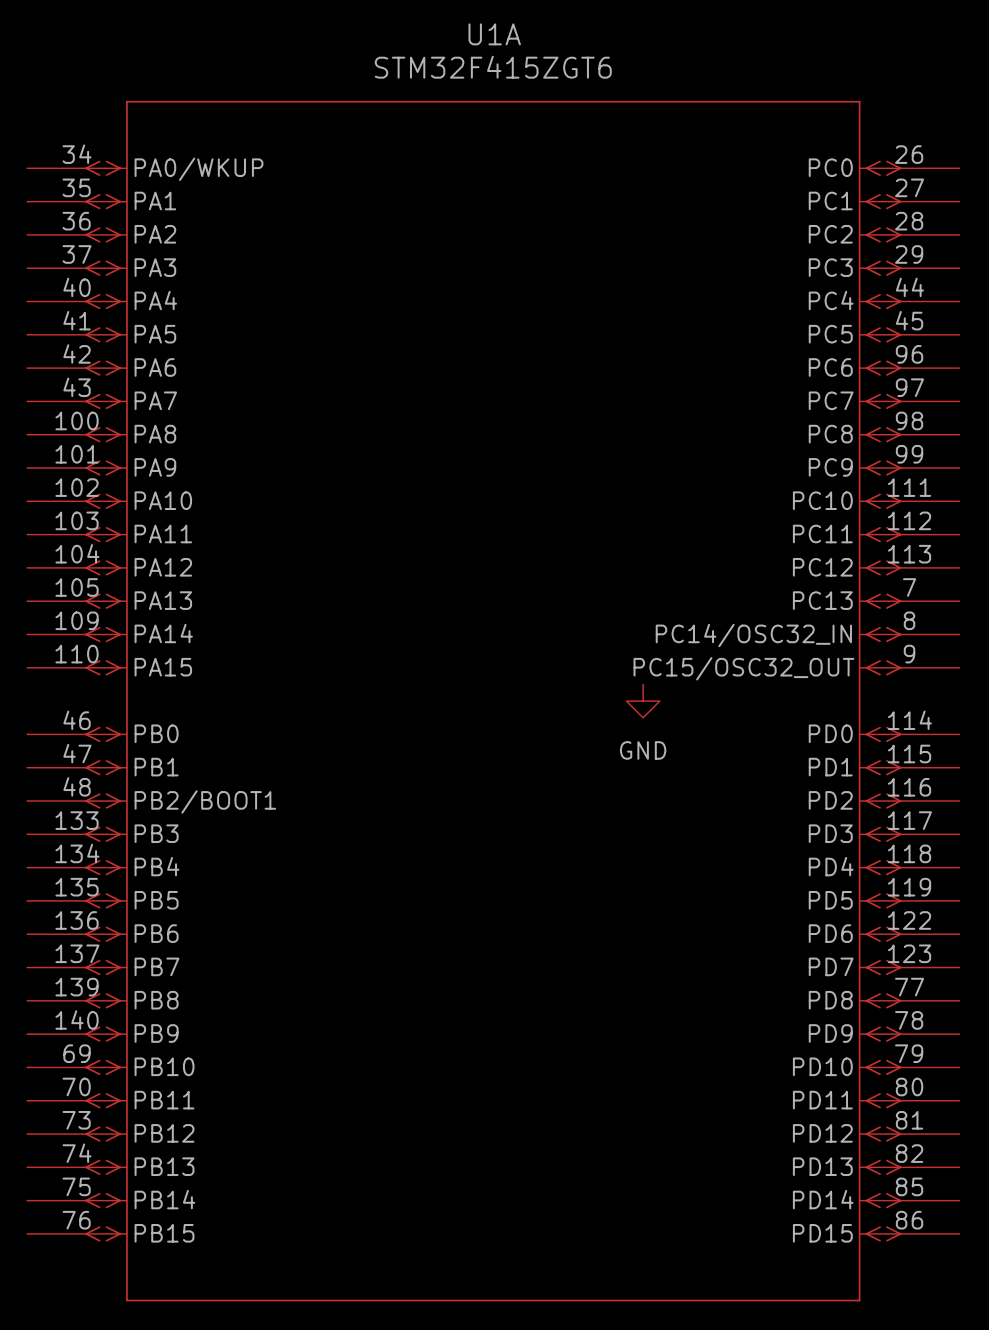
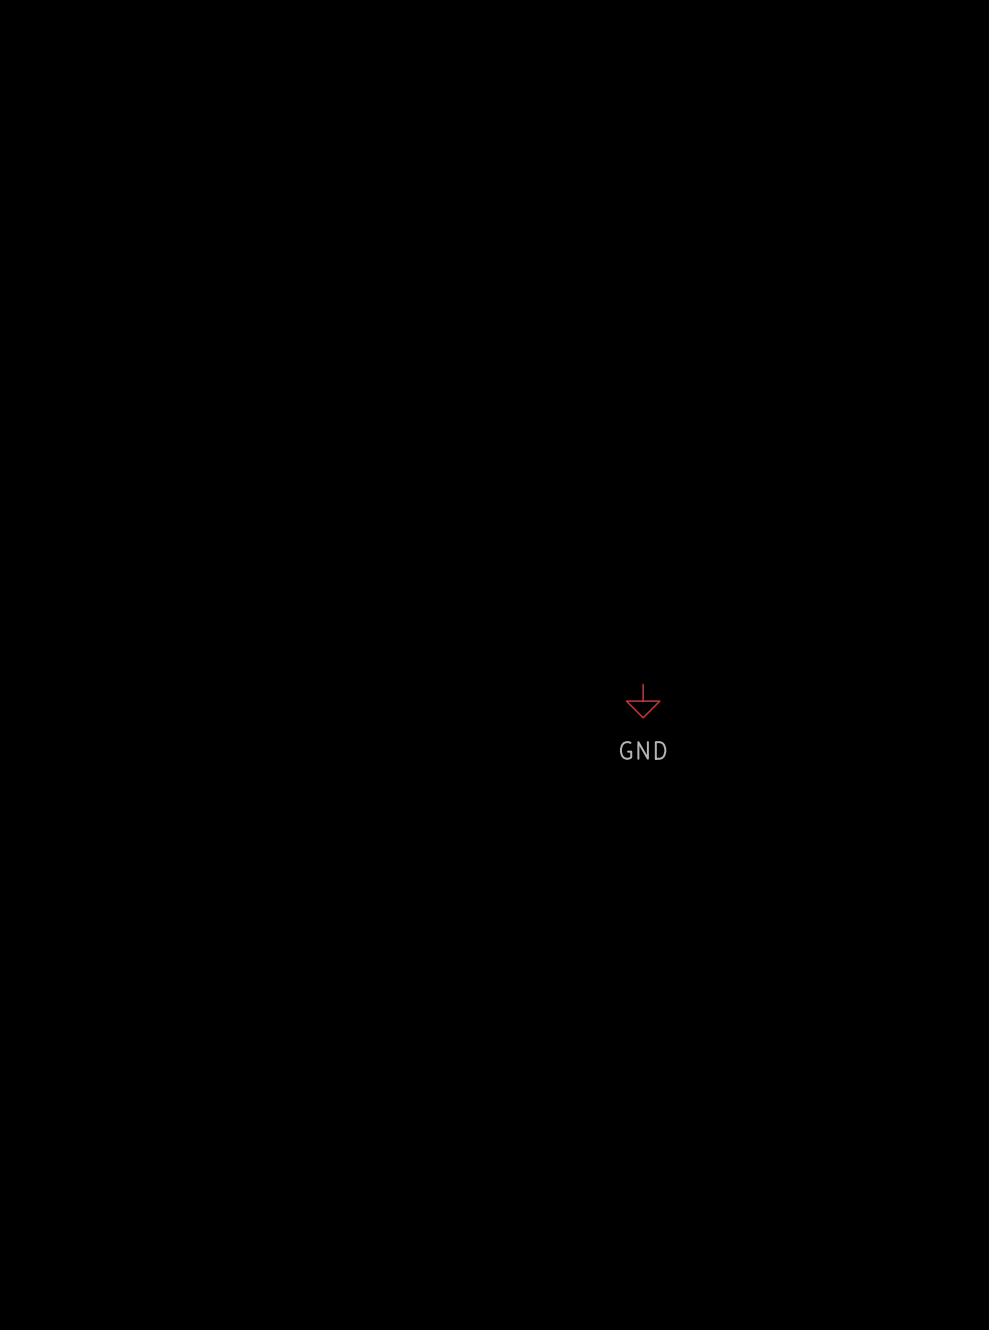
U1A: STM32F415ZGT6 (493, 701) -> none

